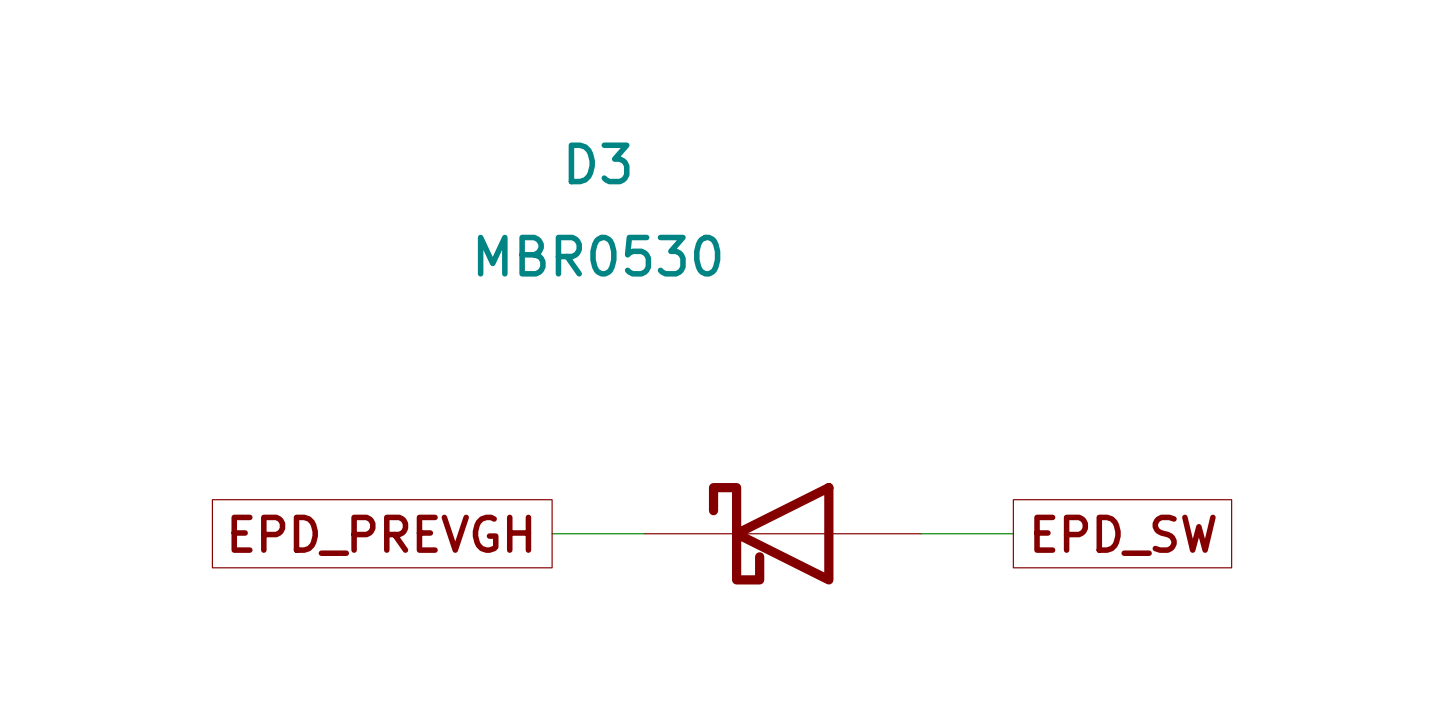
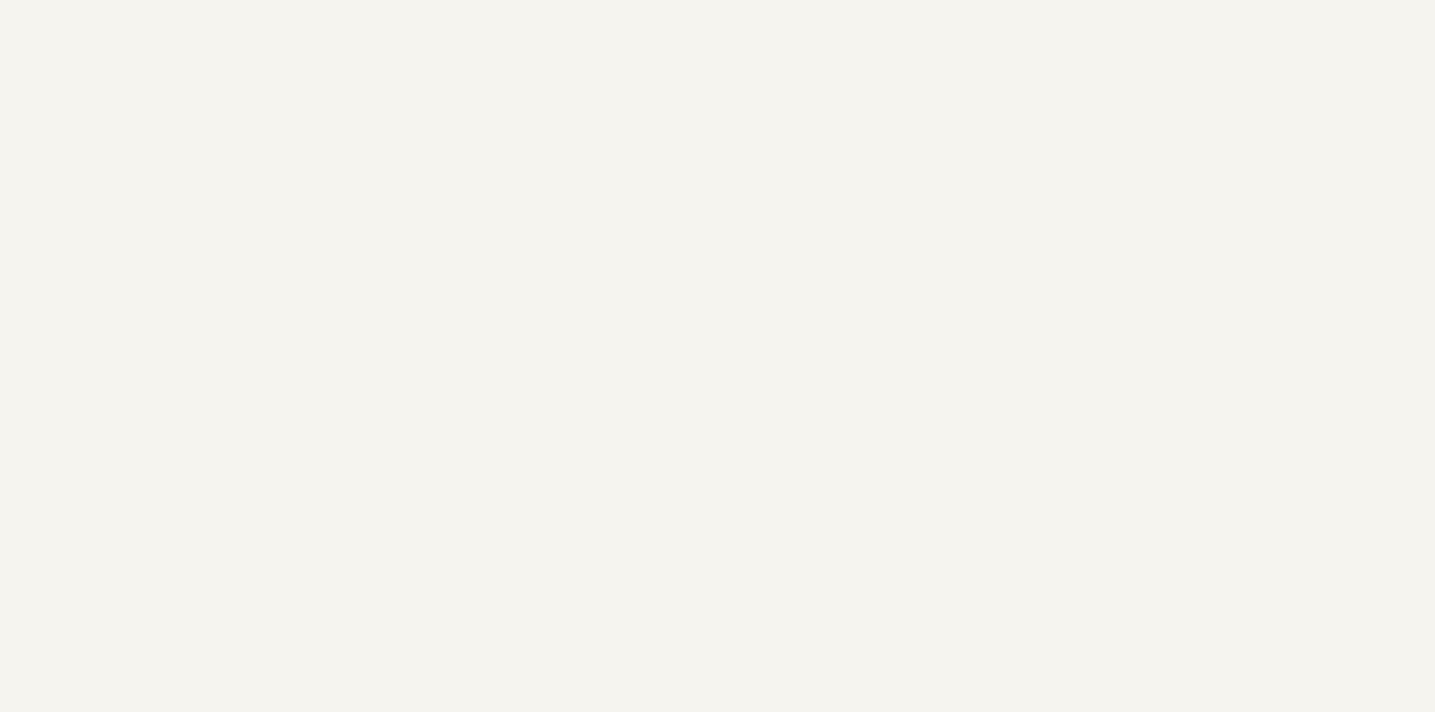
wire: (552, 533) (644, 533) -> none
D3: MBR0530 (782, 533) -> none
wire: (921, 533) (1013, 533) -> none
global label: EPD_PREVGH (381, 535) -> none
global label: EPD_SW (1124, 535) -> none

